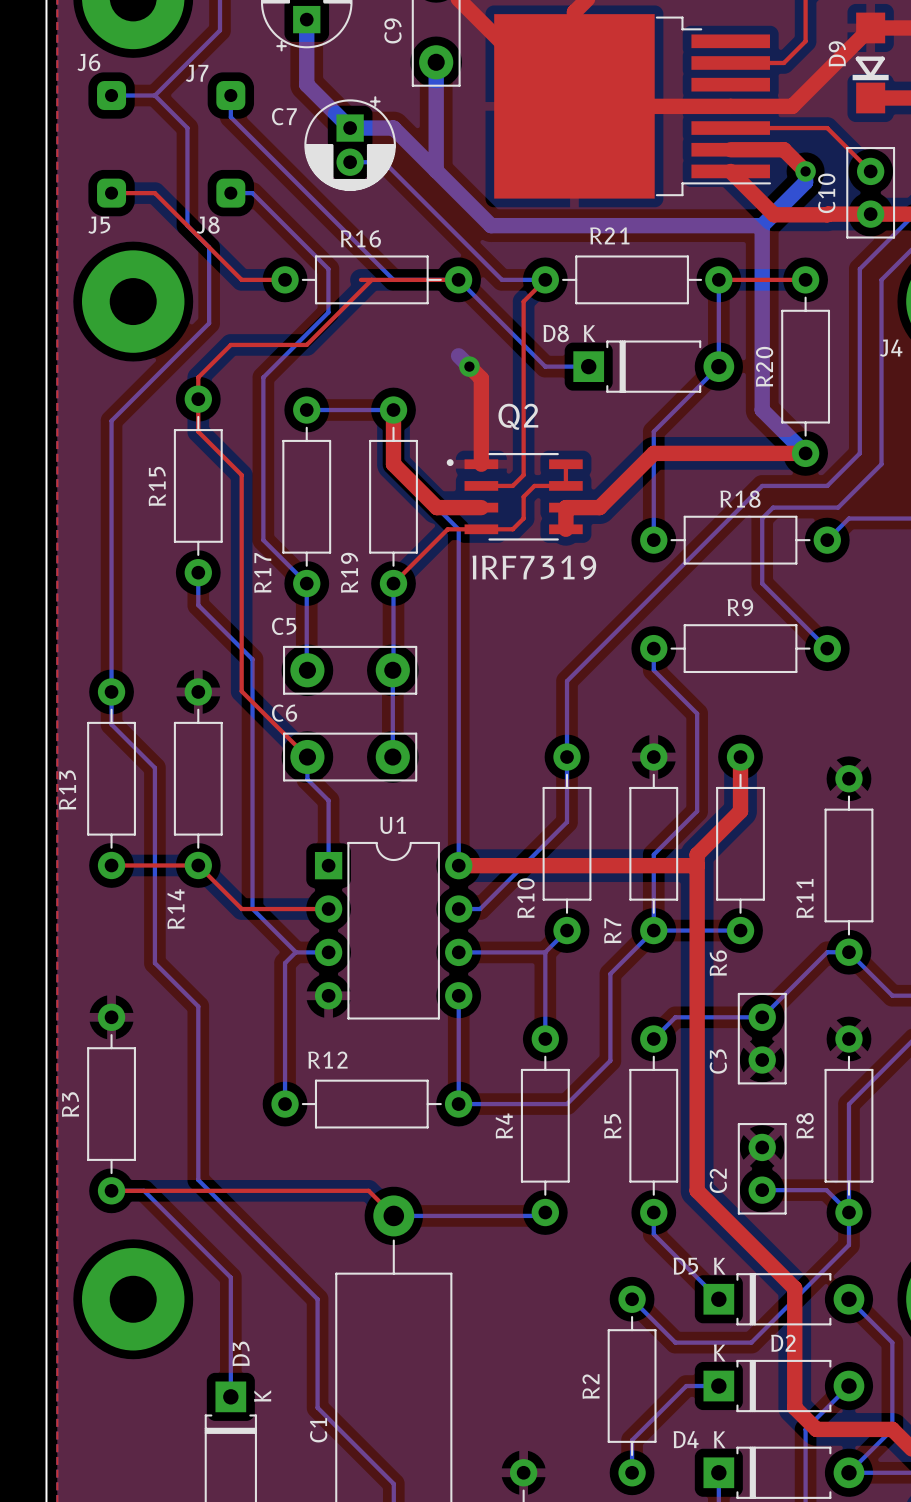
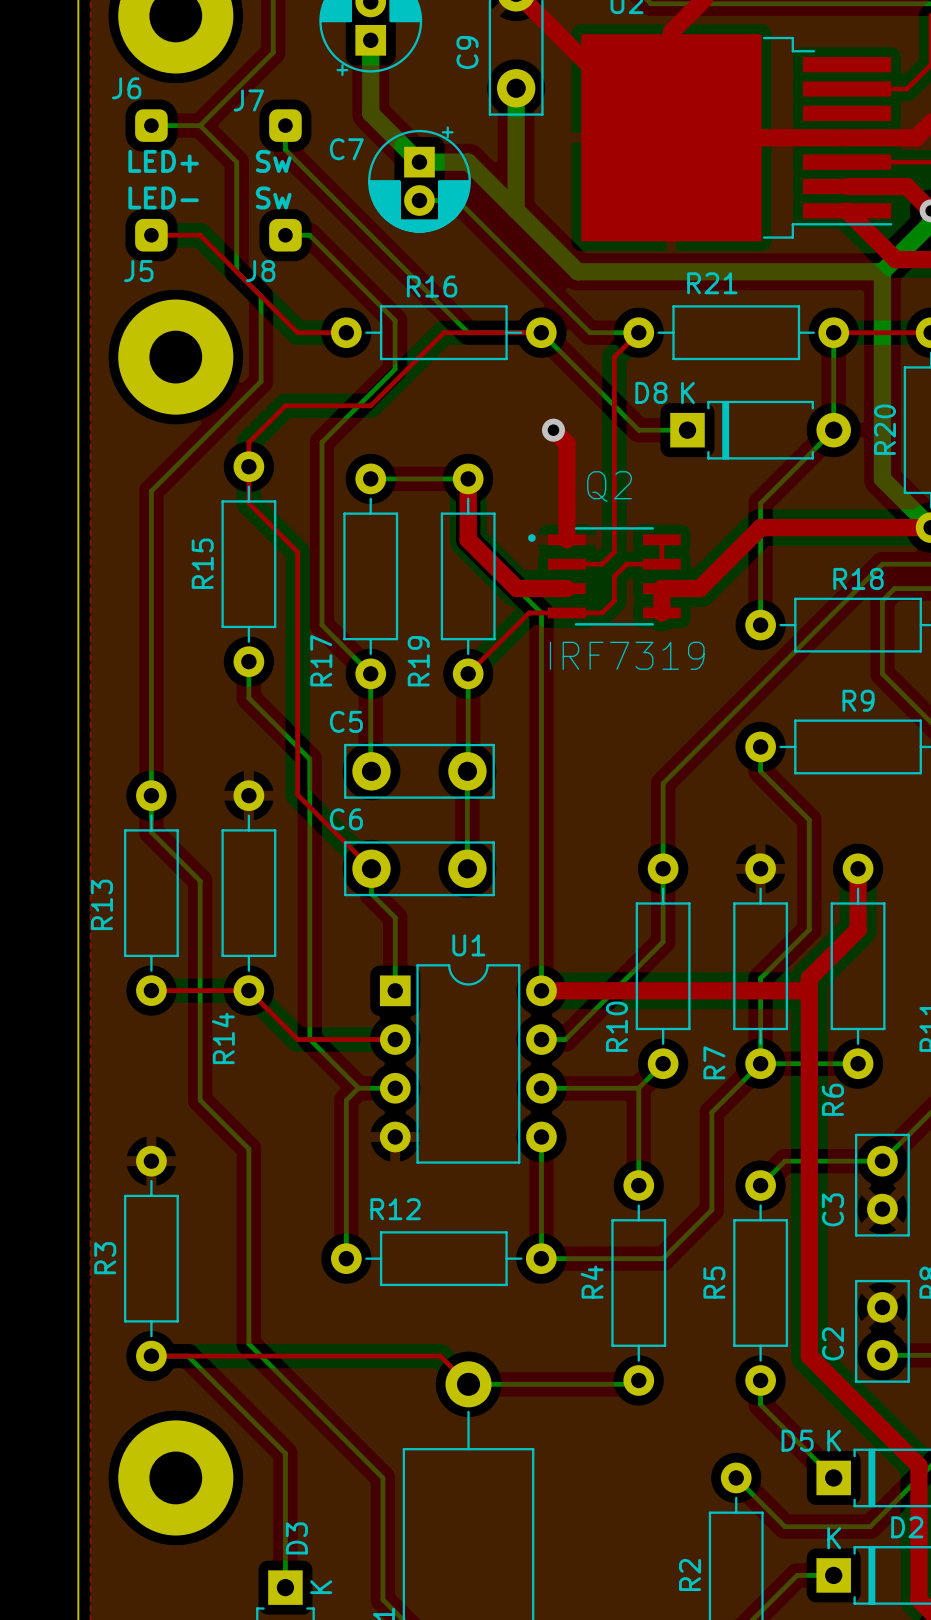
text: none -> LED+ (163, 161)
text: none -> Sw (273, 161)
text: none -> LED- (163, 197)
text: none -> Sw (273, 197)
top track: (360, 279) (371, 279) -> none
bottom track: (458, 355) (469, 366) -> none

